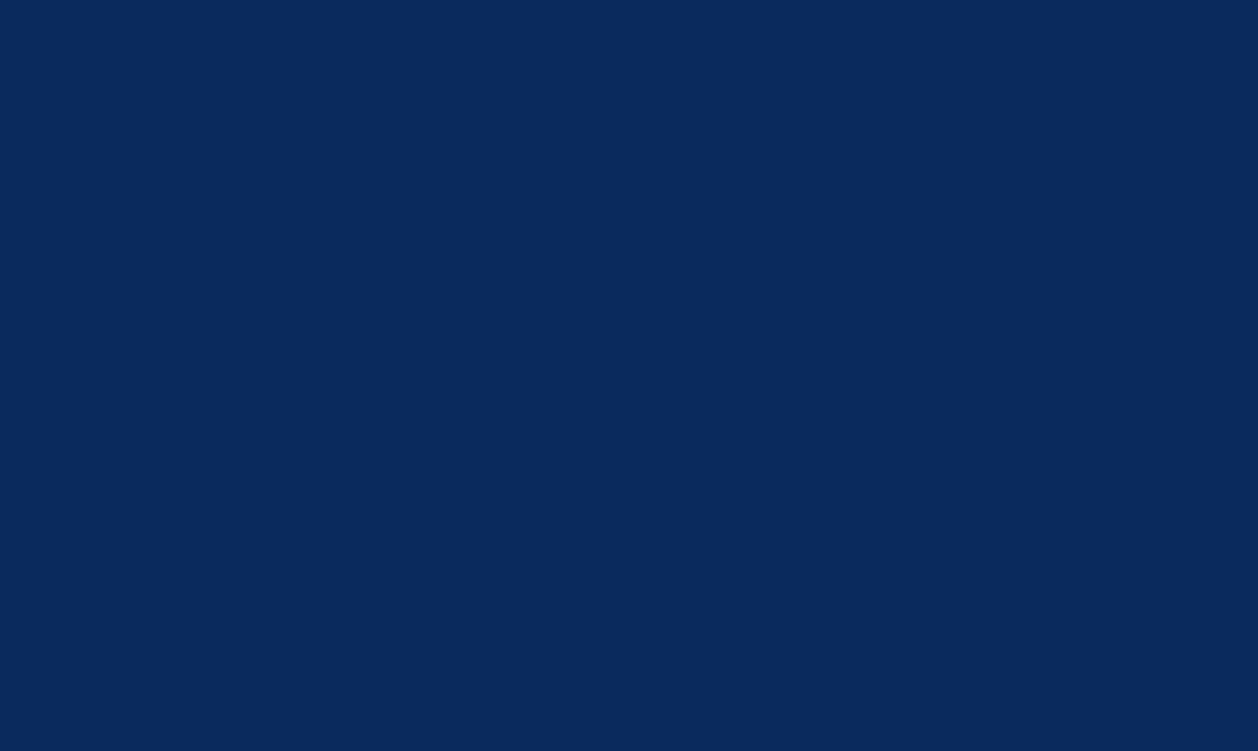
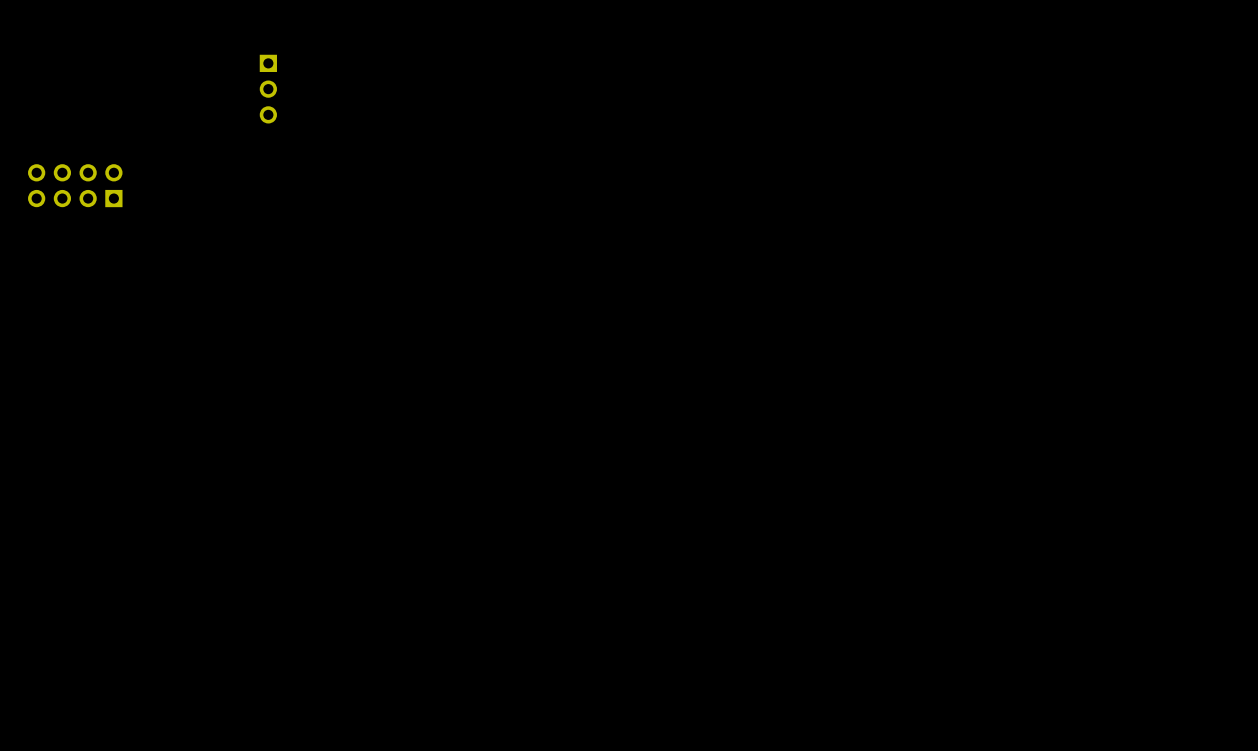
part: none -> (268, 89)
part: none -> (75, 185)

